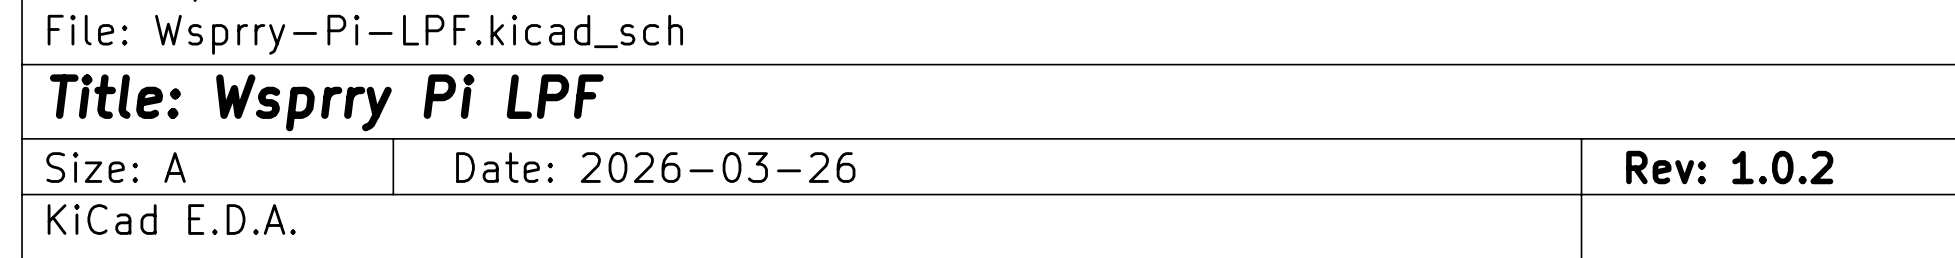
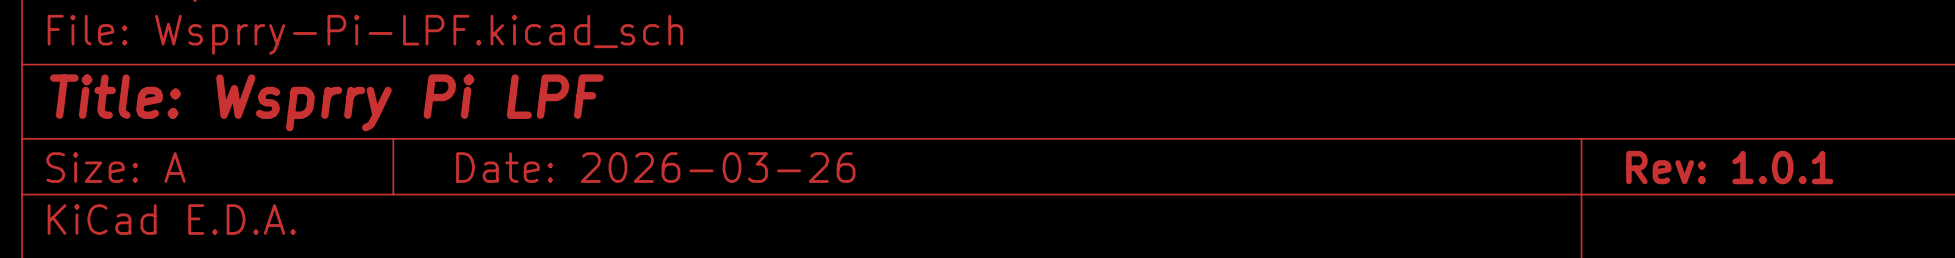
title block: Rev: 1.0.2 (1729, 167) -> Rev: 1.0.1 (1729, 167)

